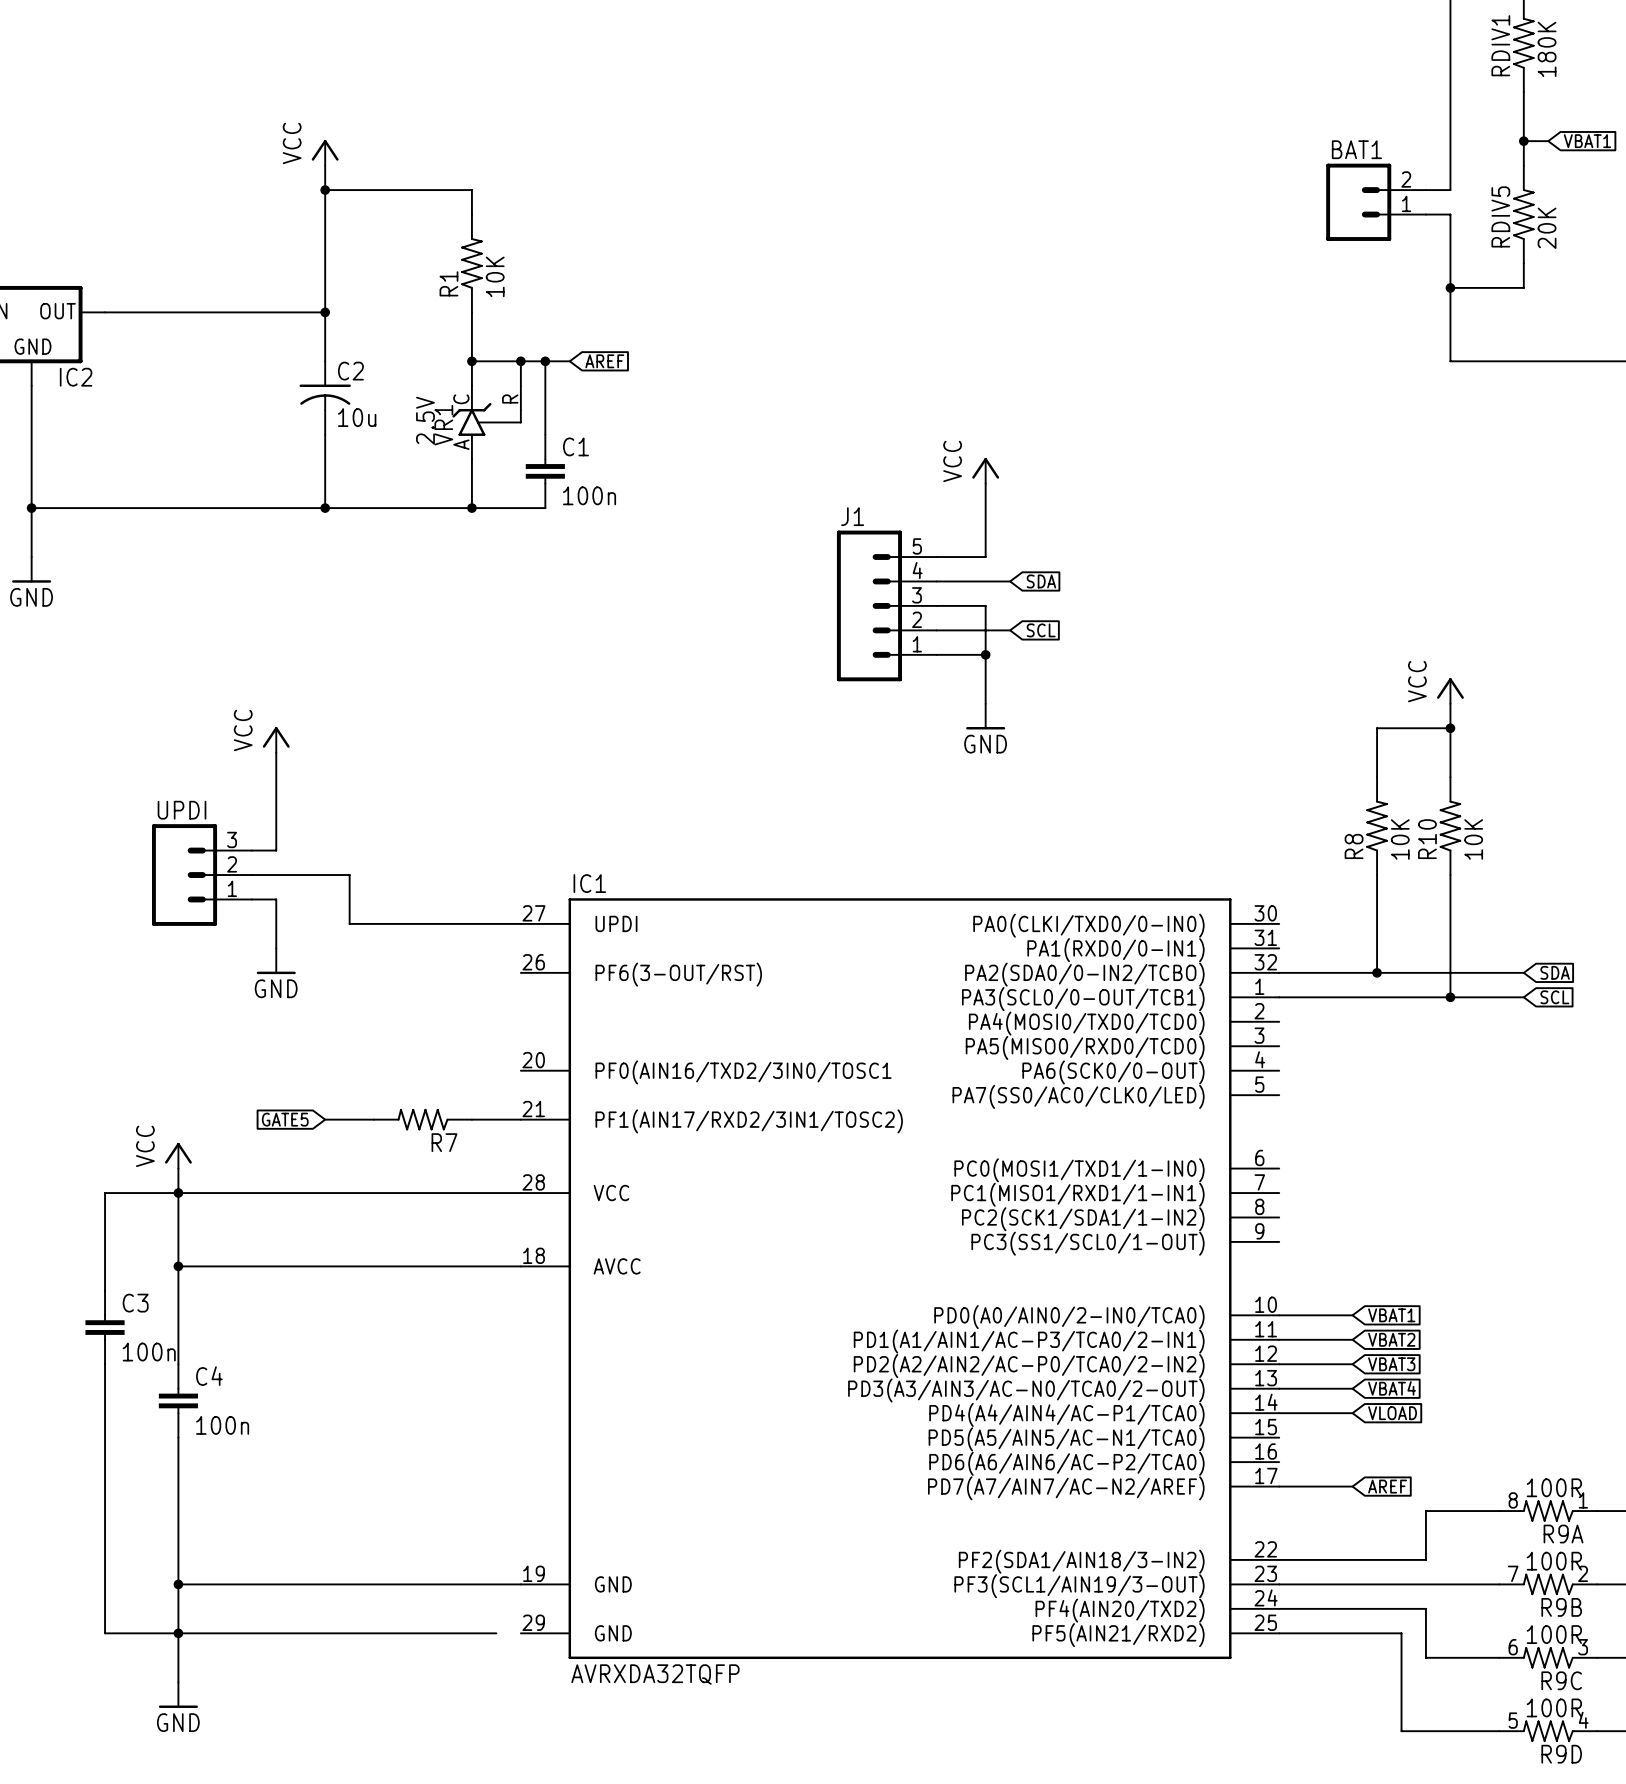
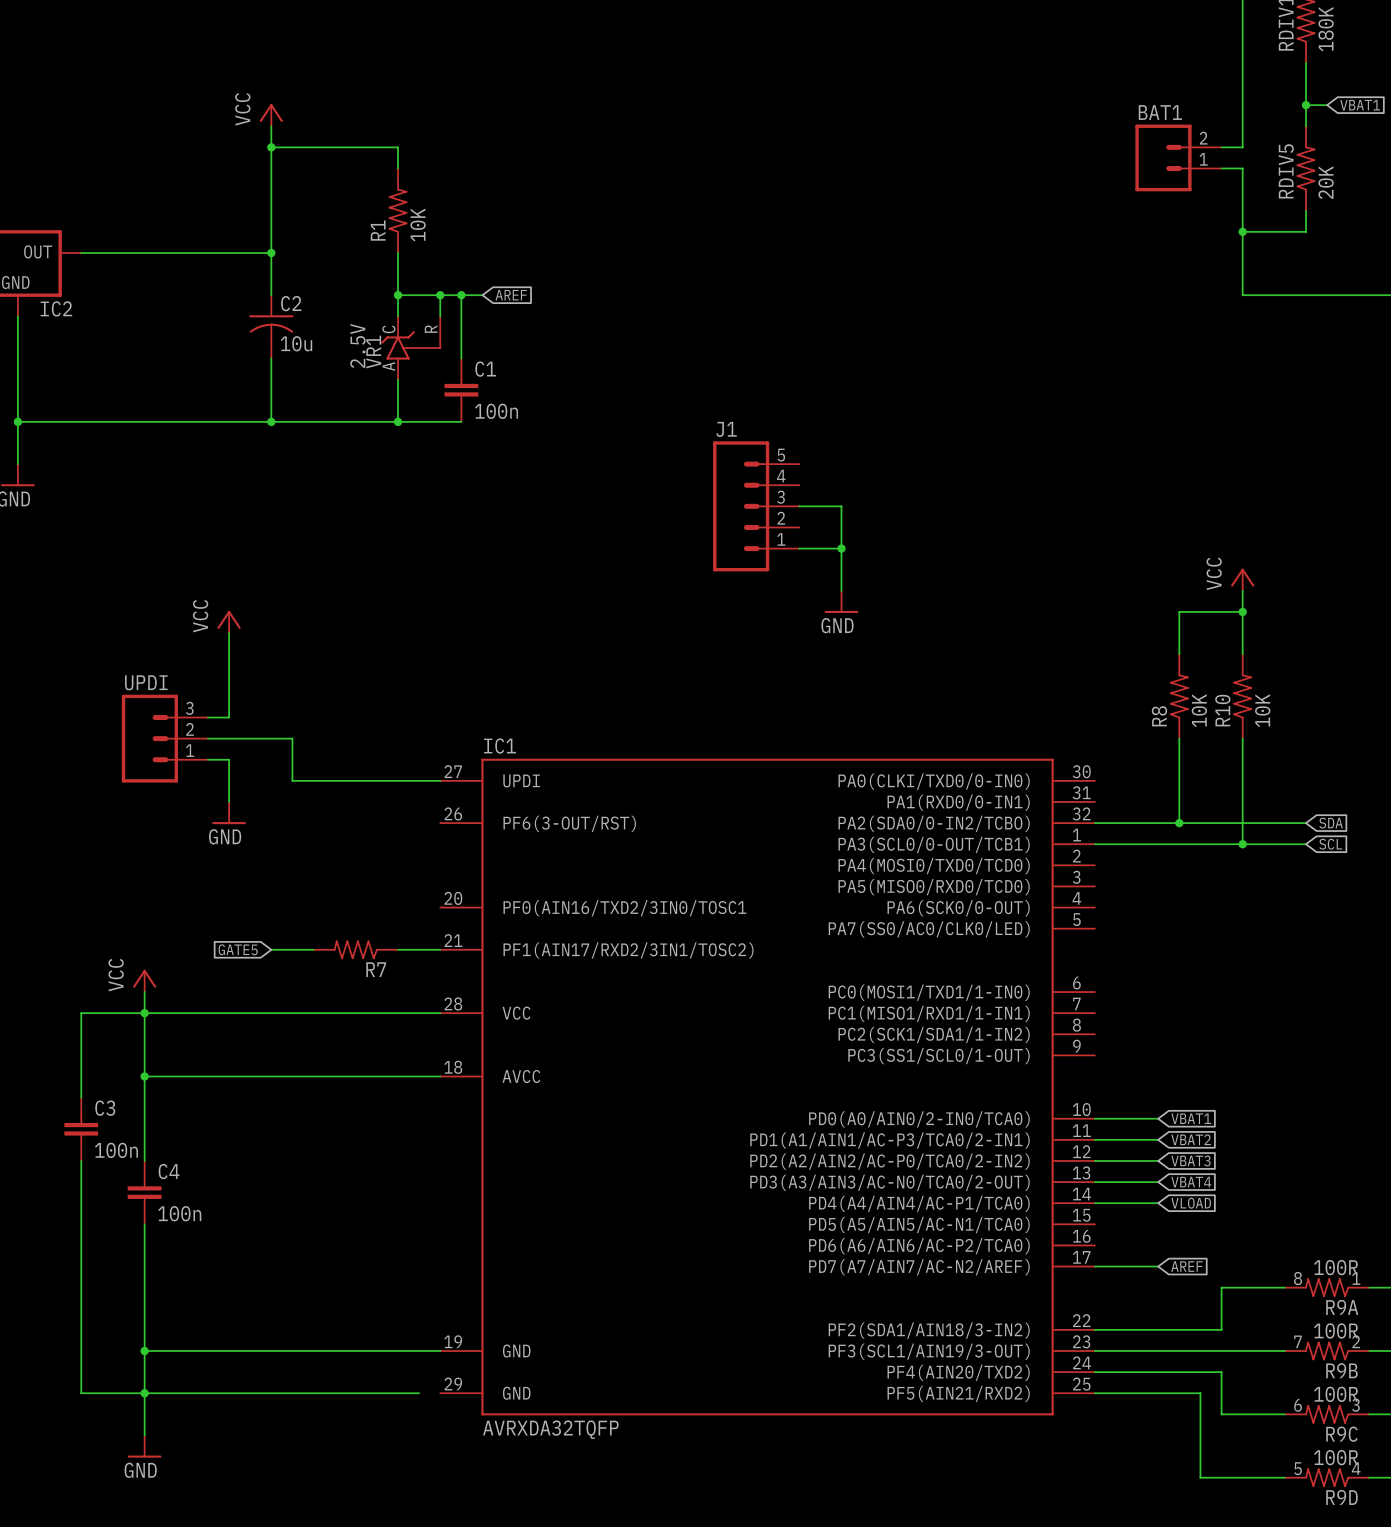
power symbol: VCC (985, 470) -> none
wire: (985, 483) (985, 557) (936, 557) -> none
wire: (936, 581) (1010, 581) -> none
global label: SDA (1041, 581) -> none
wire: (936, 630) (1010, 630) -> none
global label: SCL (1041, 630) -> none

